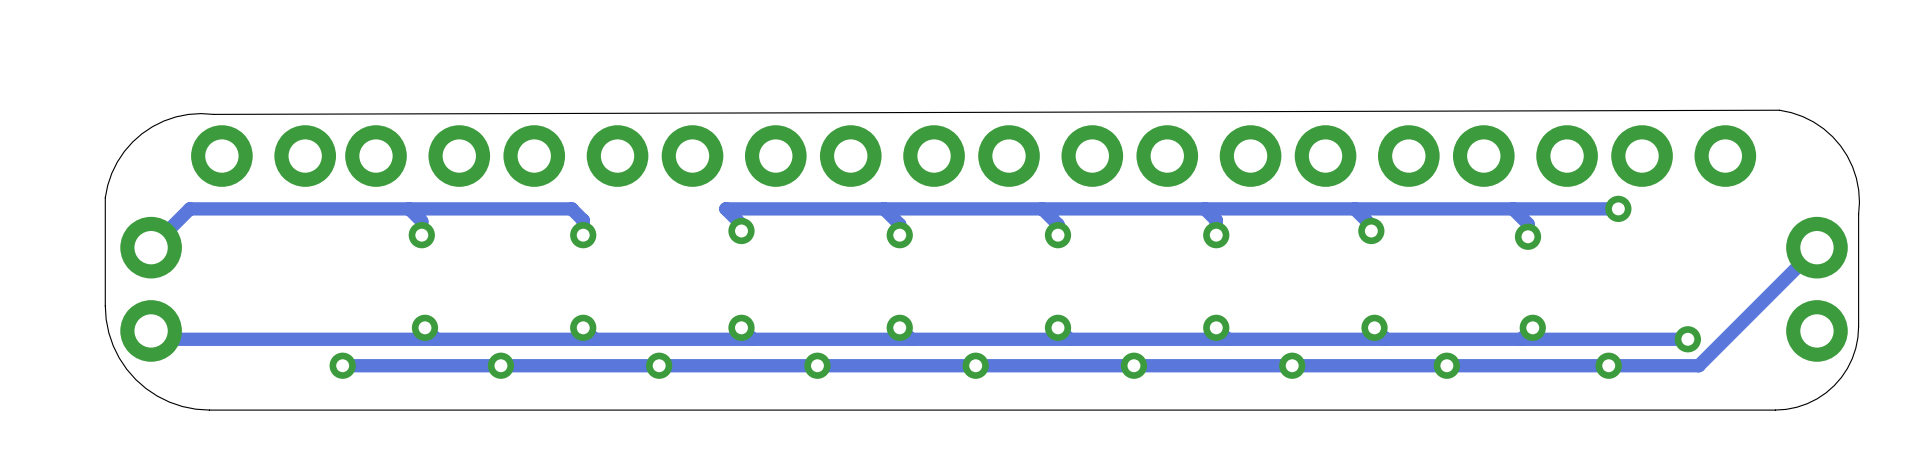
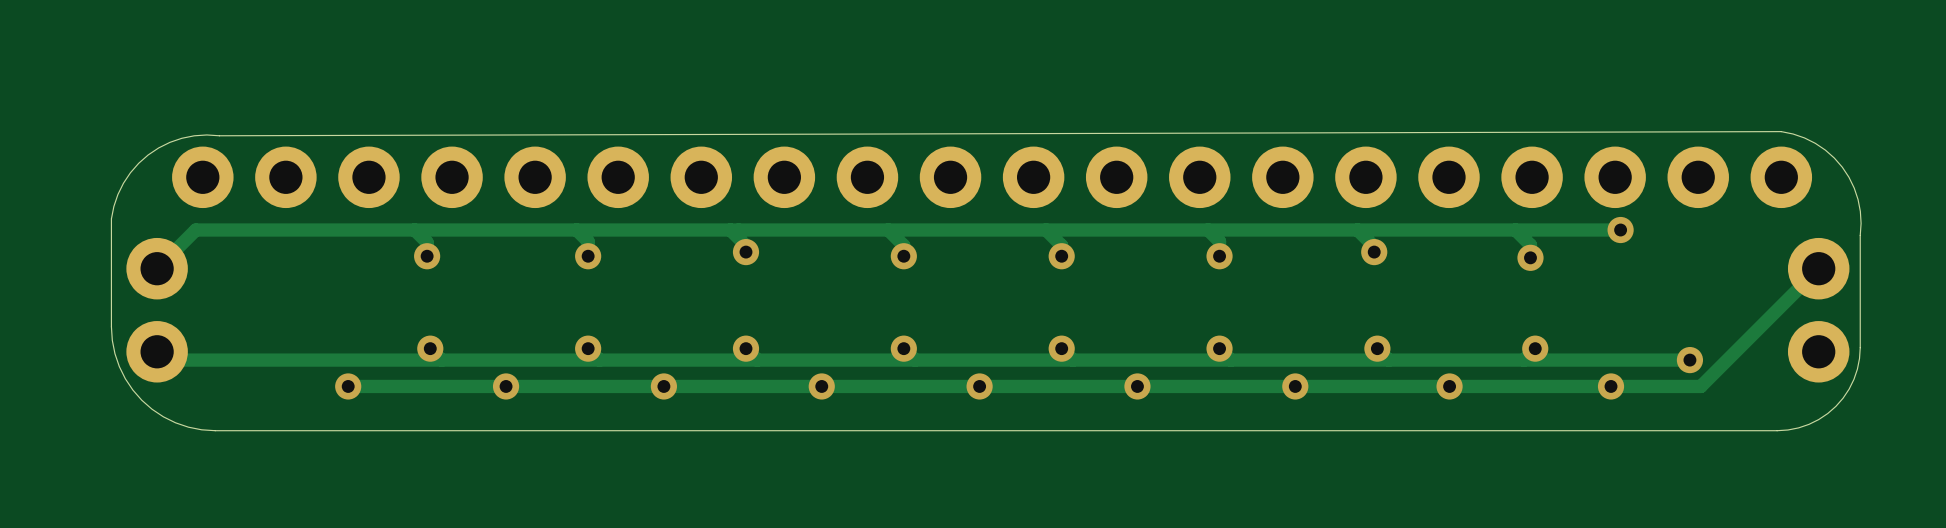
part: (263, 156) -> none
part: (417, 156) -> none
part: (575, 156) -> none
part: (734, 156) -> none
part: (892, 156) -> none
part: none -> (992, 177)
part: (1050, 156) -> none
part: (1208, 156) -> none
part: (1367, 156) -> none
part: (1525, 156) -> none
part: (1683, 156) -> none
track: none -> (730, 230) (576, 230)

